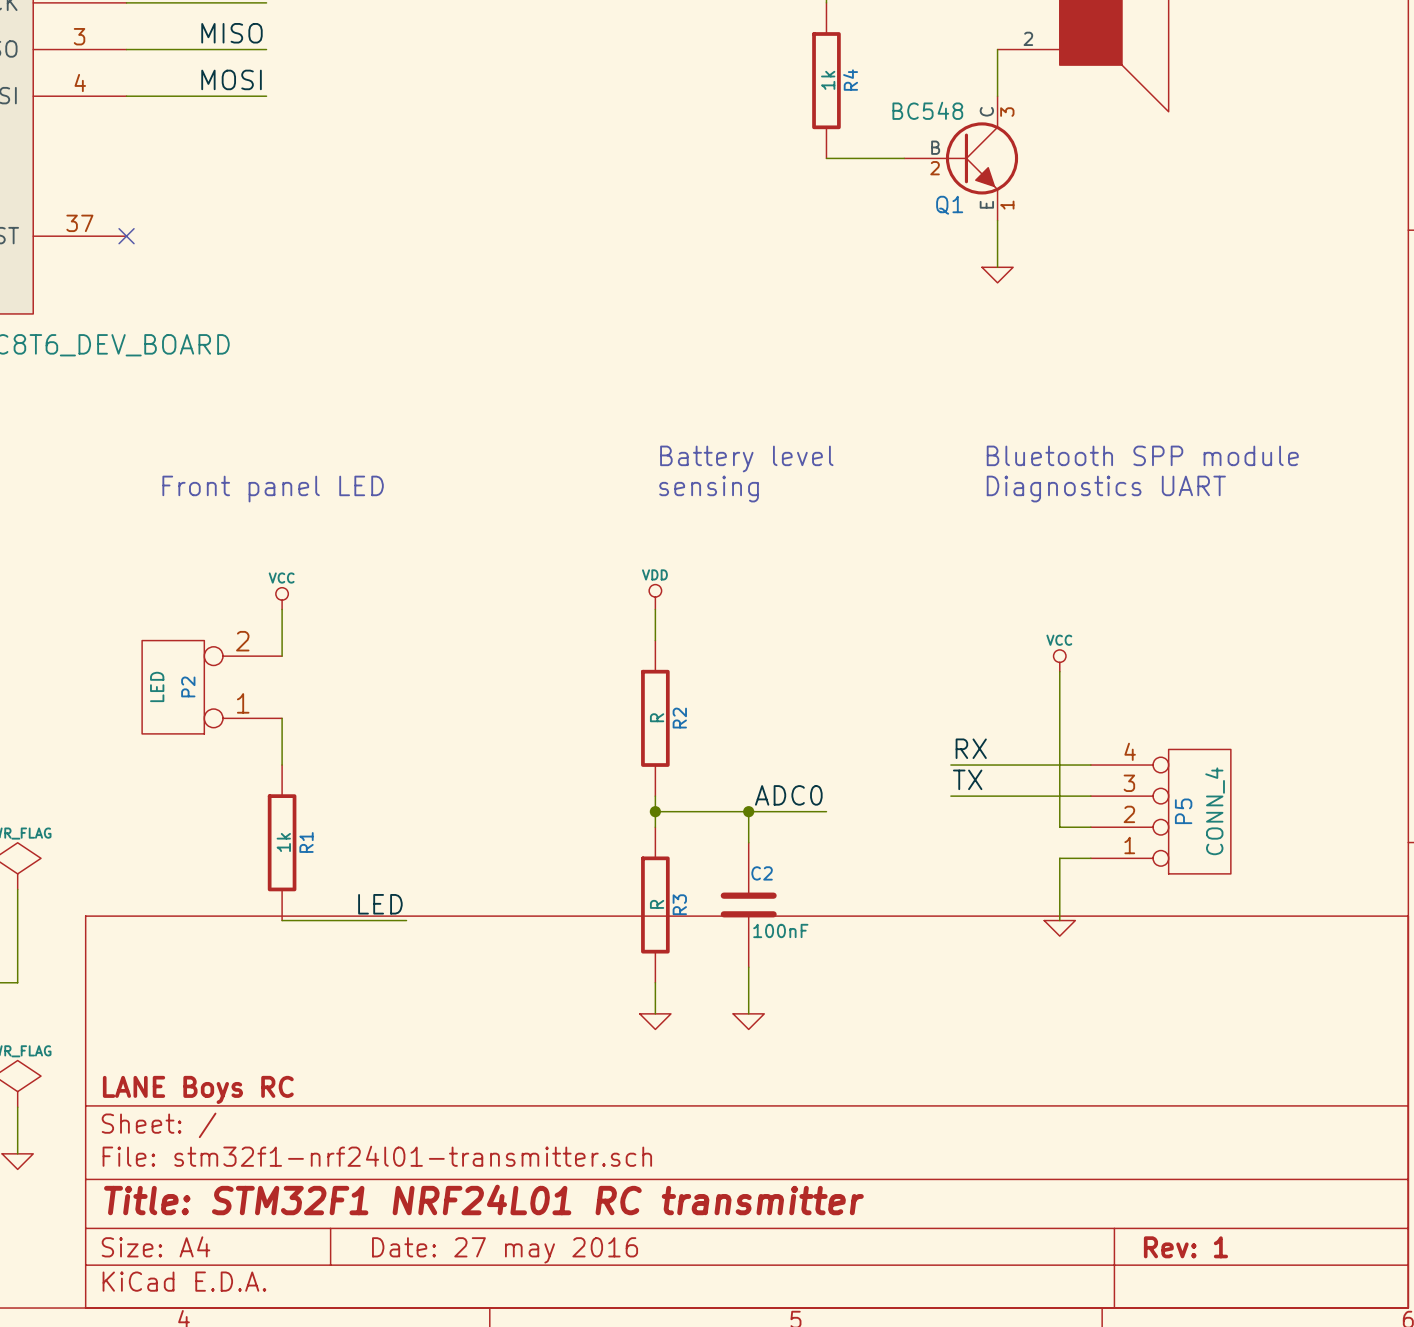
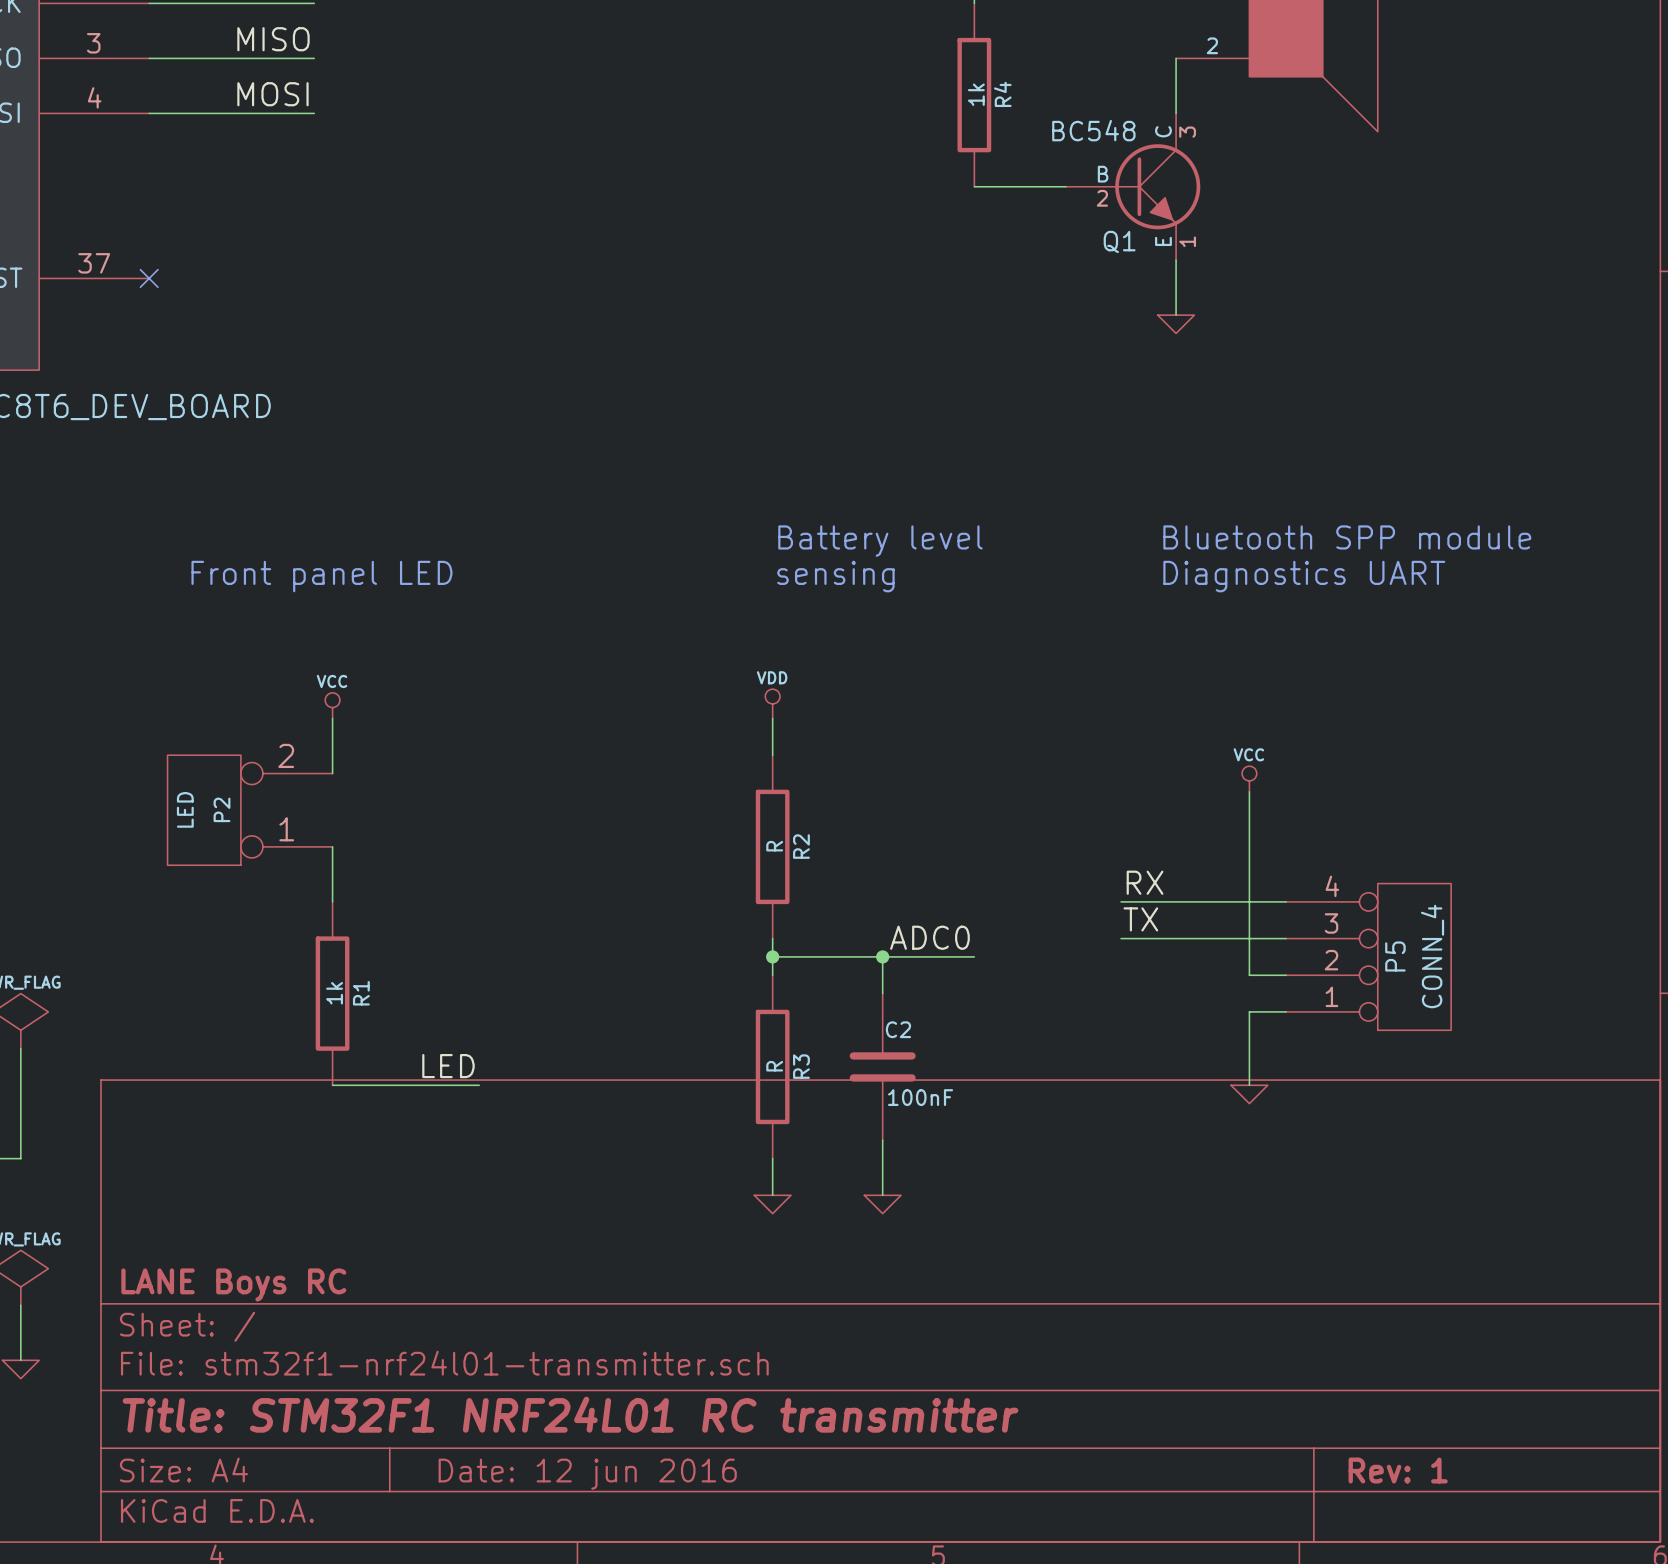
title block: Date: 27 may 2016 (505, 1250) -> Date: 12 jun 2016 (587, 1474)

